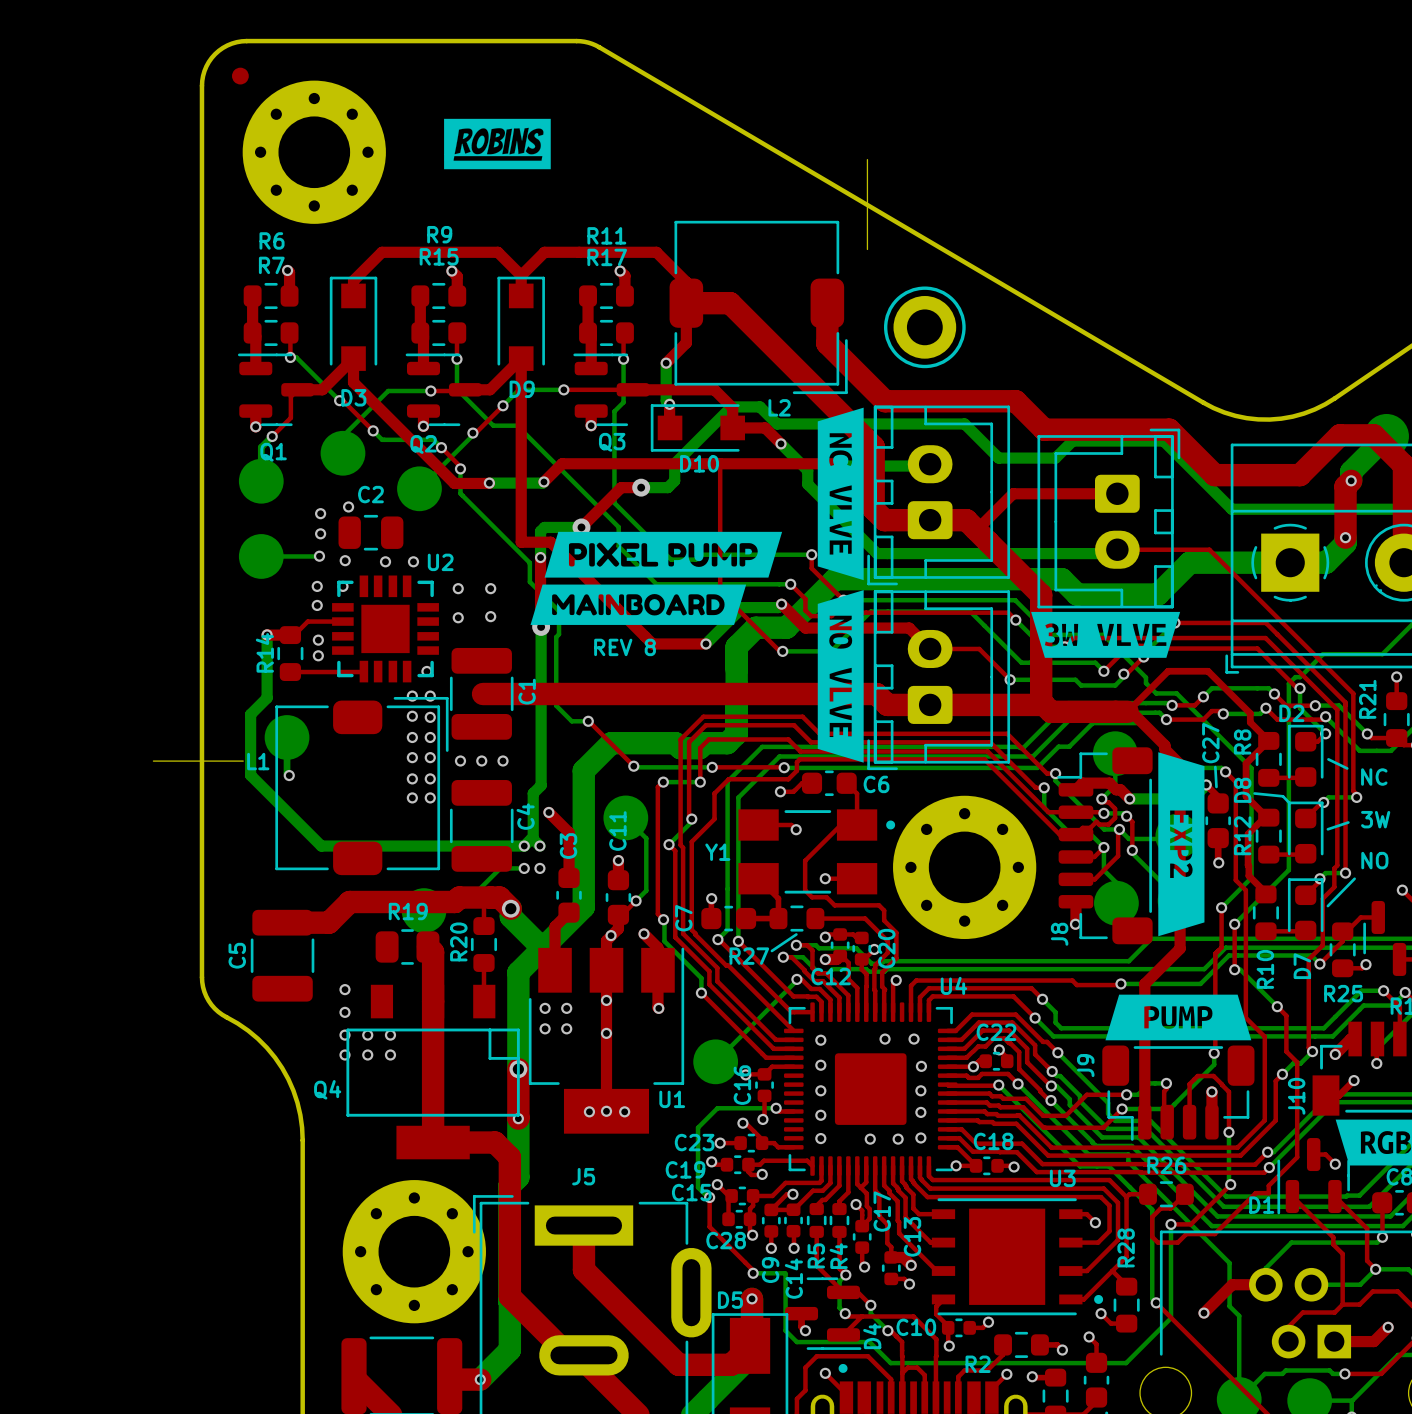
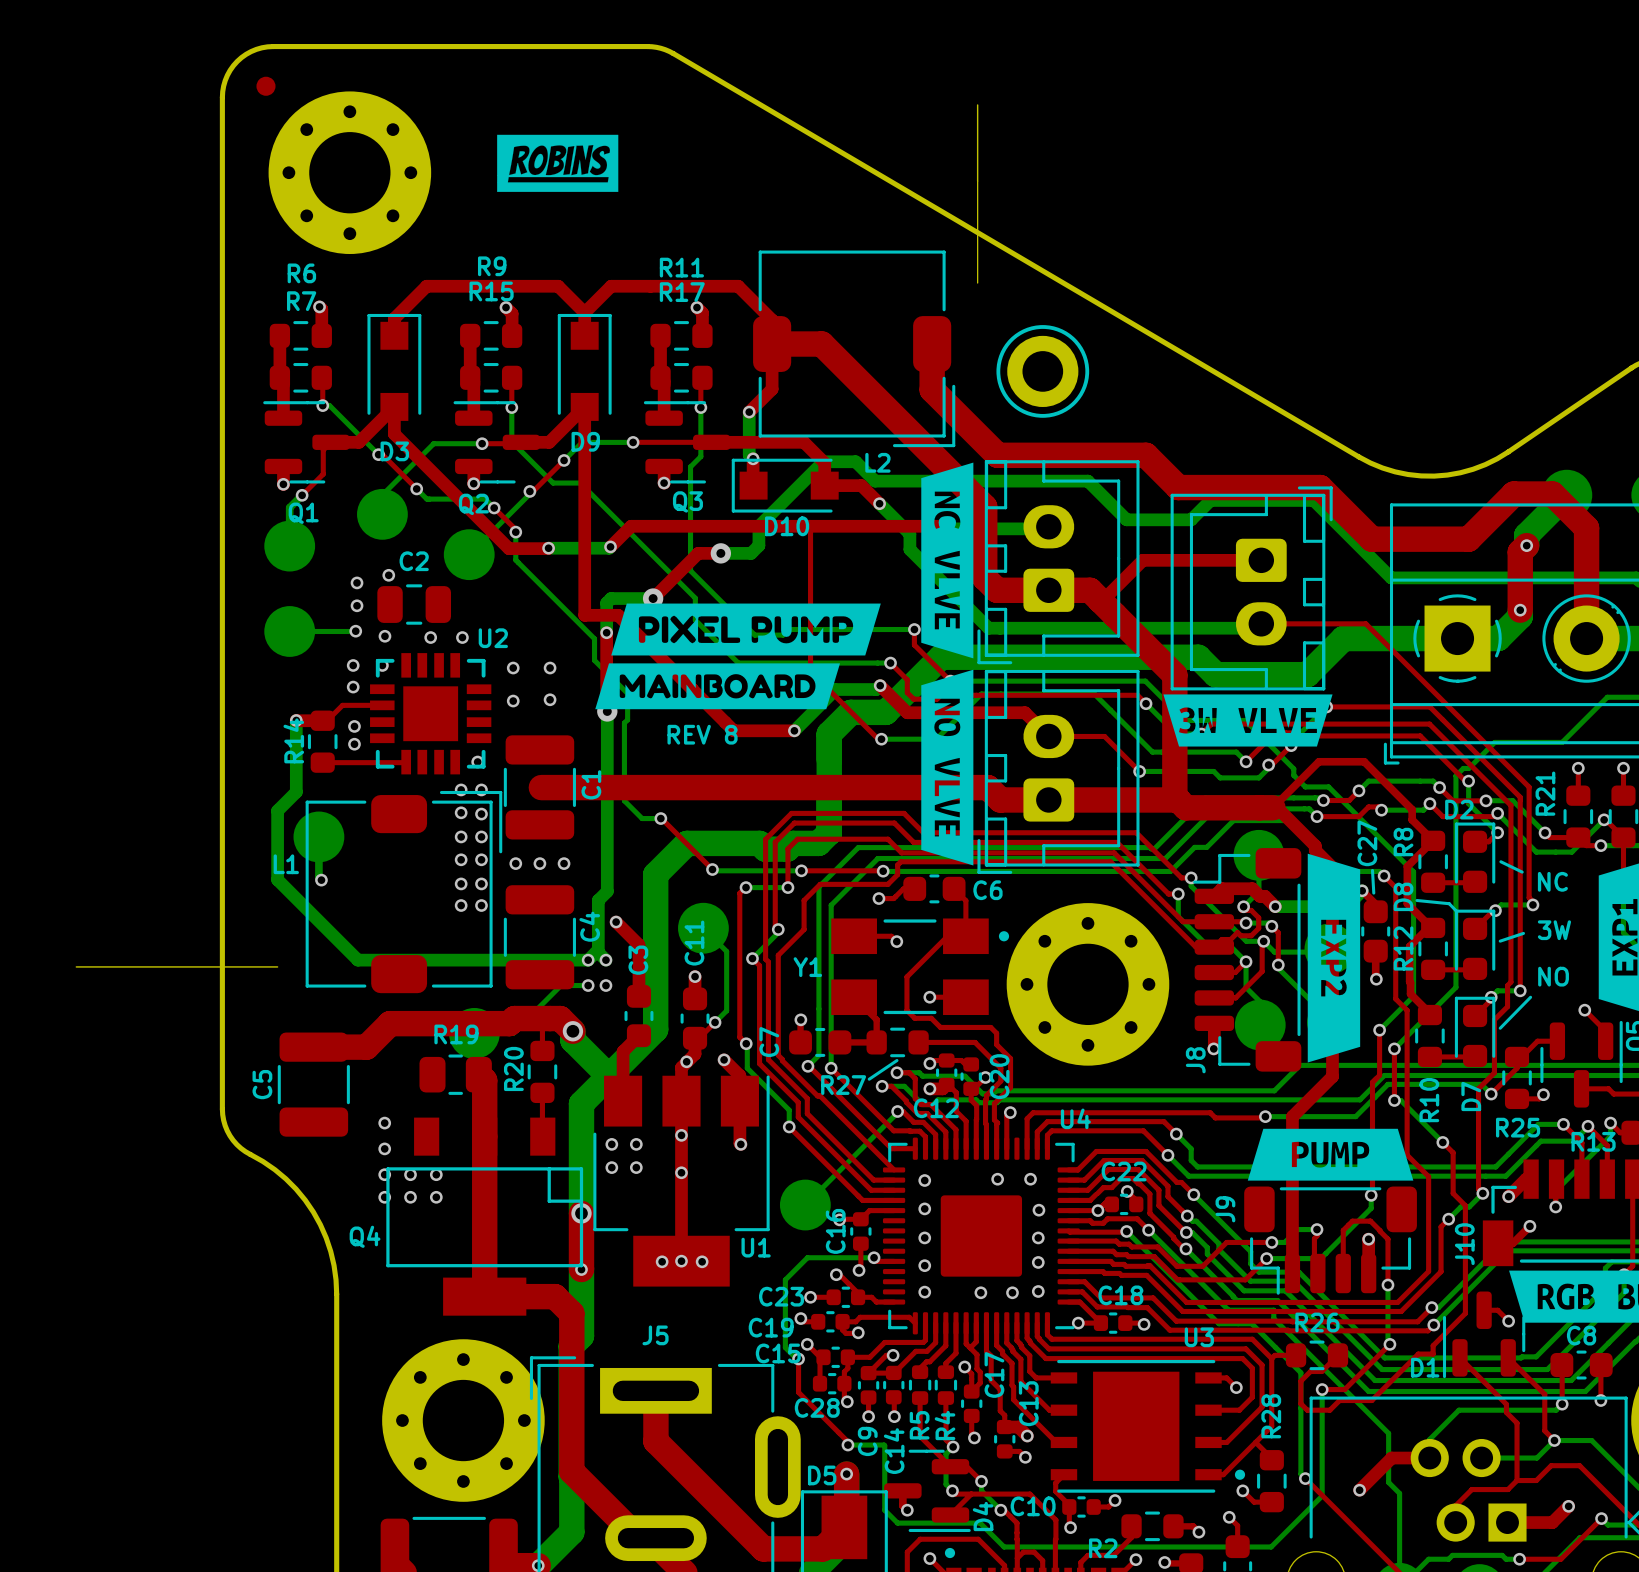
board edge: none -> (977, 104) (977, 181)
board edge: (153, 761) (243, 761) -> none
board edge: none -> (76, 966) (277, 966)

